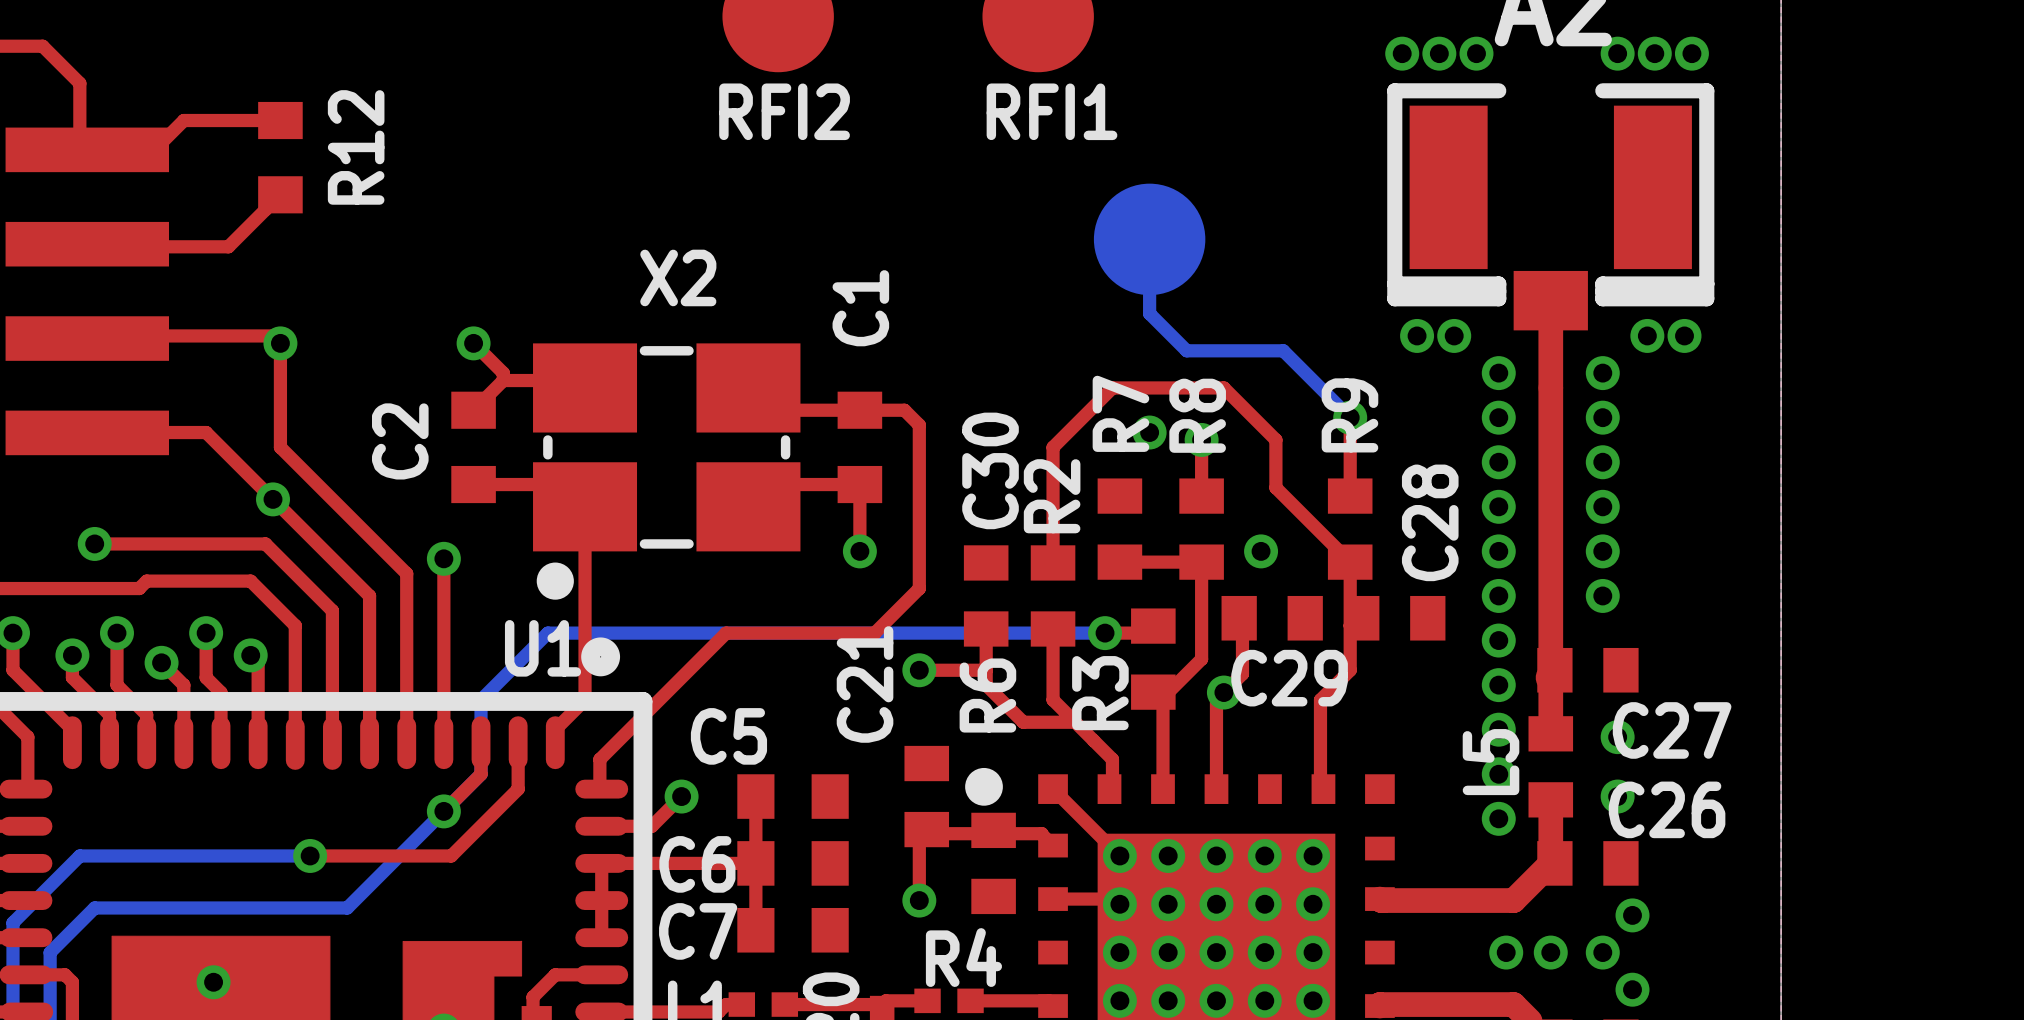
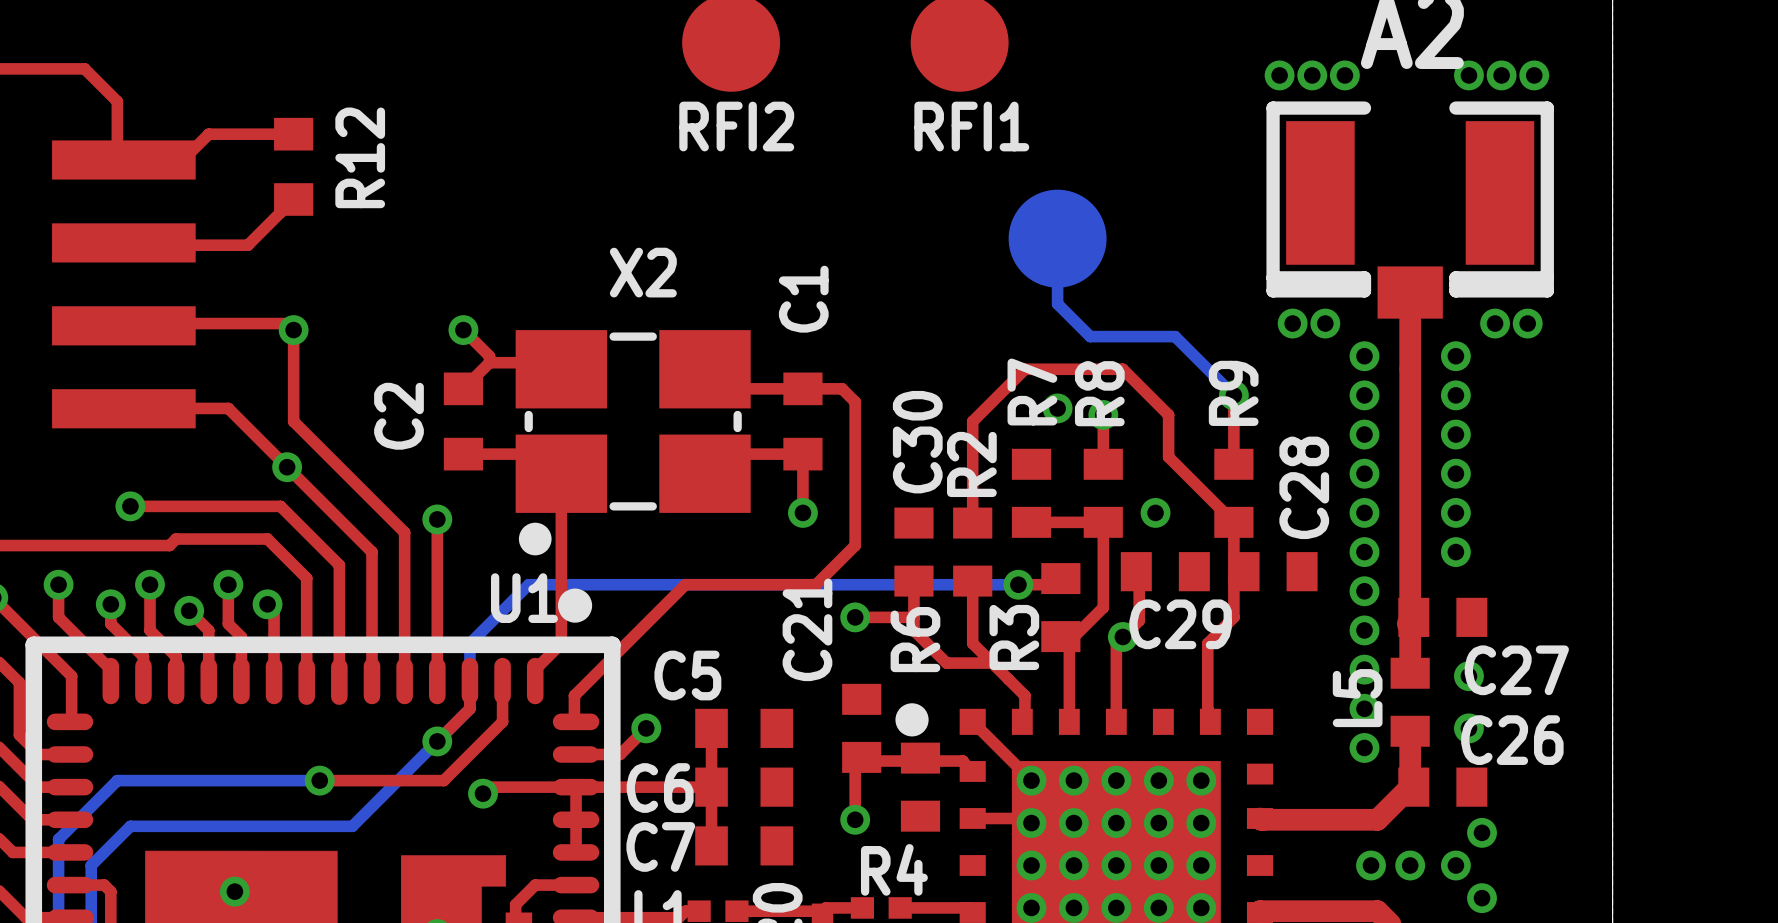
top track: none -> (576, 787) (489, 787) (483, 793)
via: none -> (483, 793)

